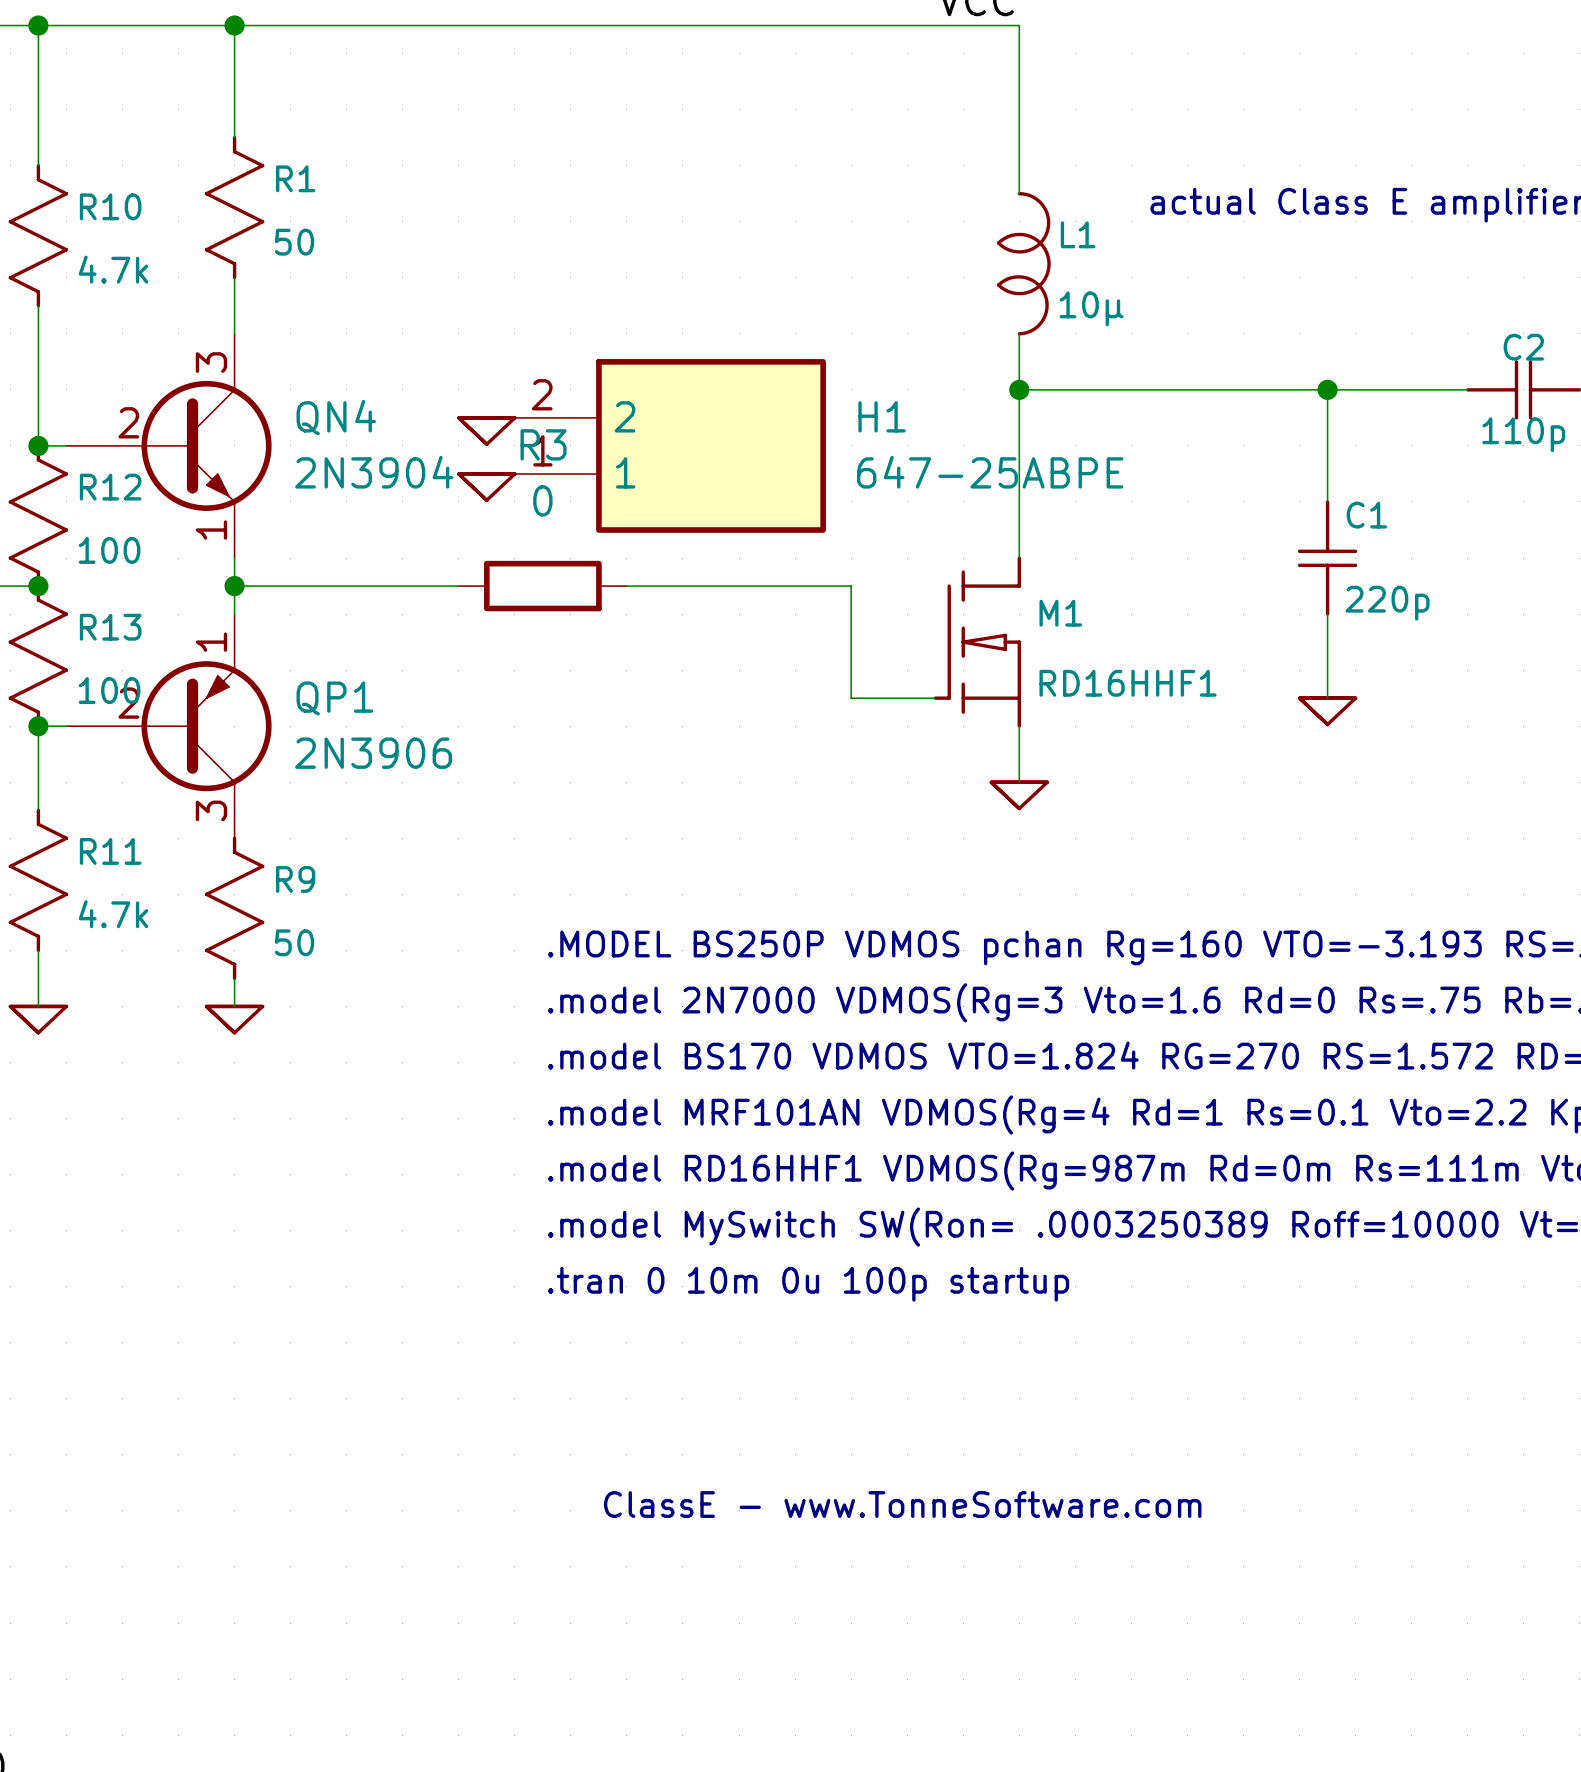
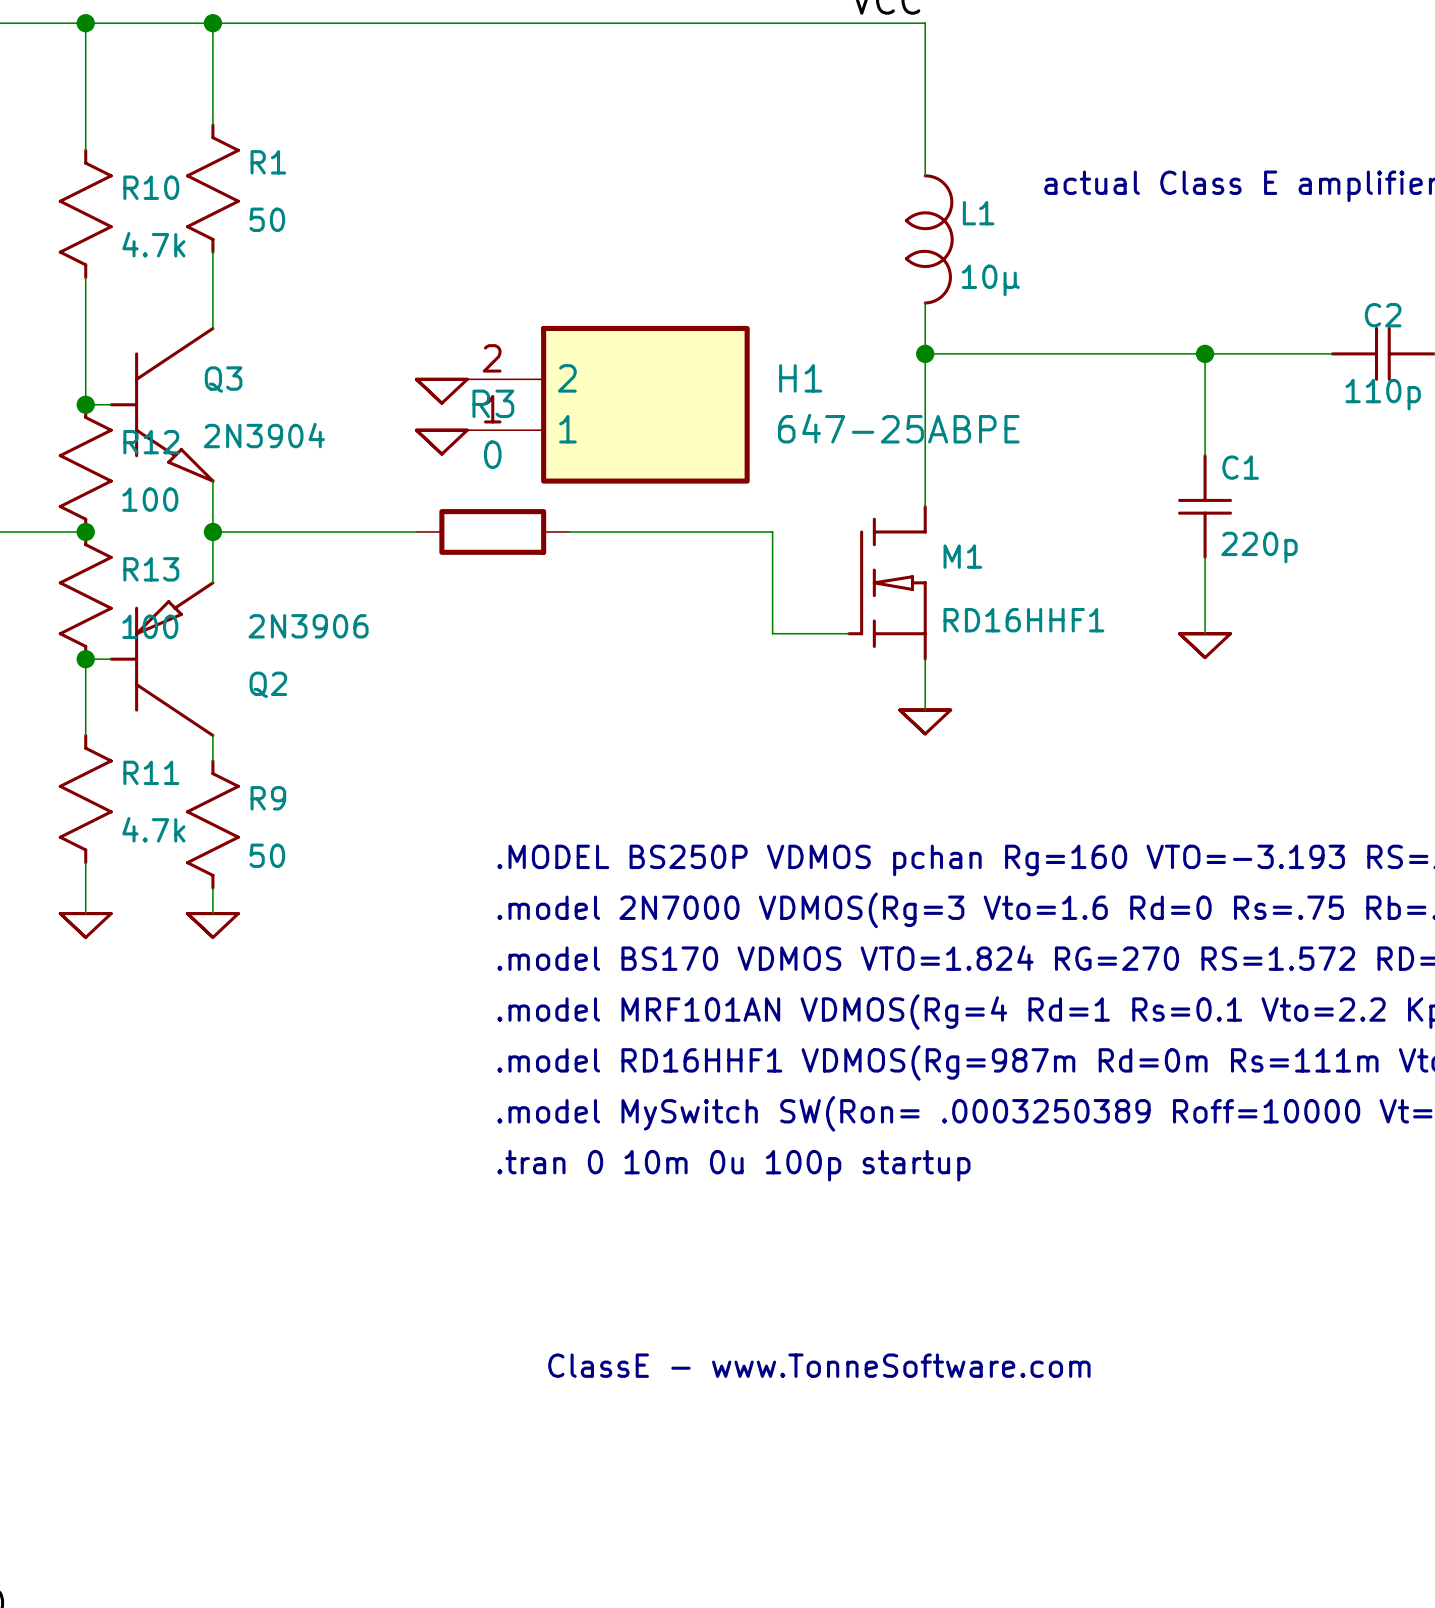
wire: (38, 25) (38, 165) -> (85, 23) (85, 150)
junction position: (38, 25) -> (85, 23)
R10 position: (38, 235) -> (85, 213)
wire: (38, 305) (38, 445) (66, 445) -> (85, 277) (85, 404) (111, 404)
junction position: (38, 445) -> (85, 404)
QN4: 2N3904 (168, 445) -> none
Q3: none -> 2N3904 (162, 404)
R12 position: (38, 516) -> (85, 468)
wire: none -> (34, 531) (85, 531)
junction position: (38, 586) -> (85, 531)
R13 position: (38, 656) -> (85, 595)
junction position: (38, 726) -> (85, 659)
wire: (66, 726) (38, 726) (38, 810) -> (111, 659) (85, 659) (85, 735)
QP1: 2N3906 (168, 726) -> none
Q2: none -> 2N3906 (162, 659)
R11 position: (38, 880) -> (85, 799)
wire: (38, 950) (38, 1006) -> (85, 862) (85, 913)
power symbol position: (38, 1019) -> (85, 925)

